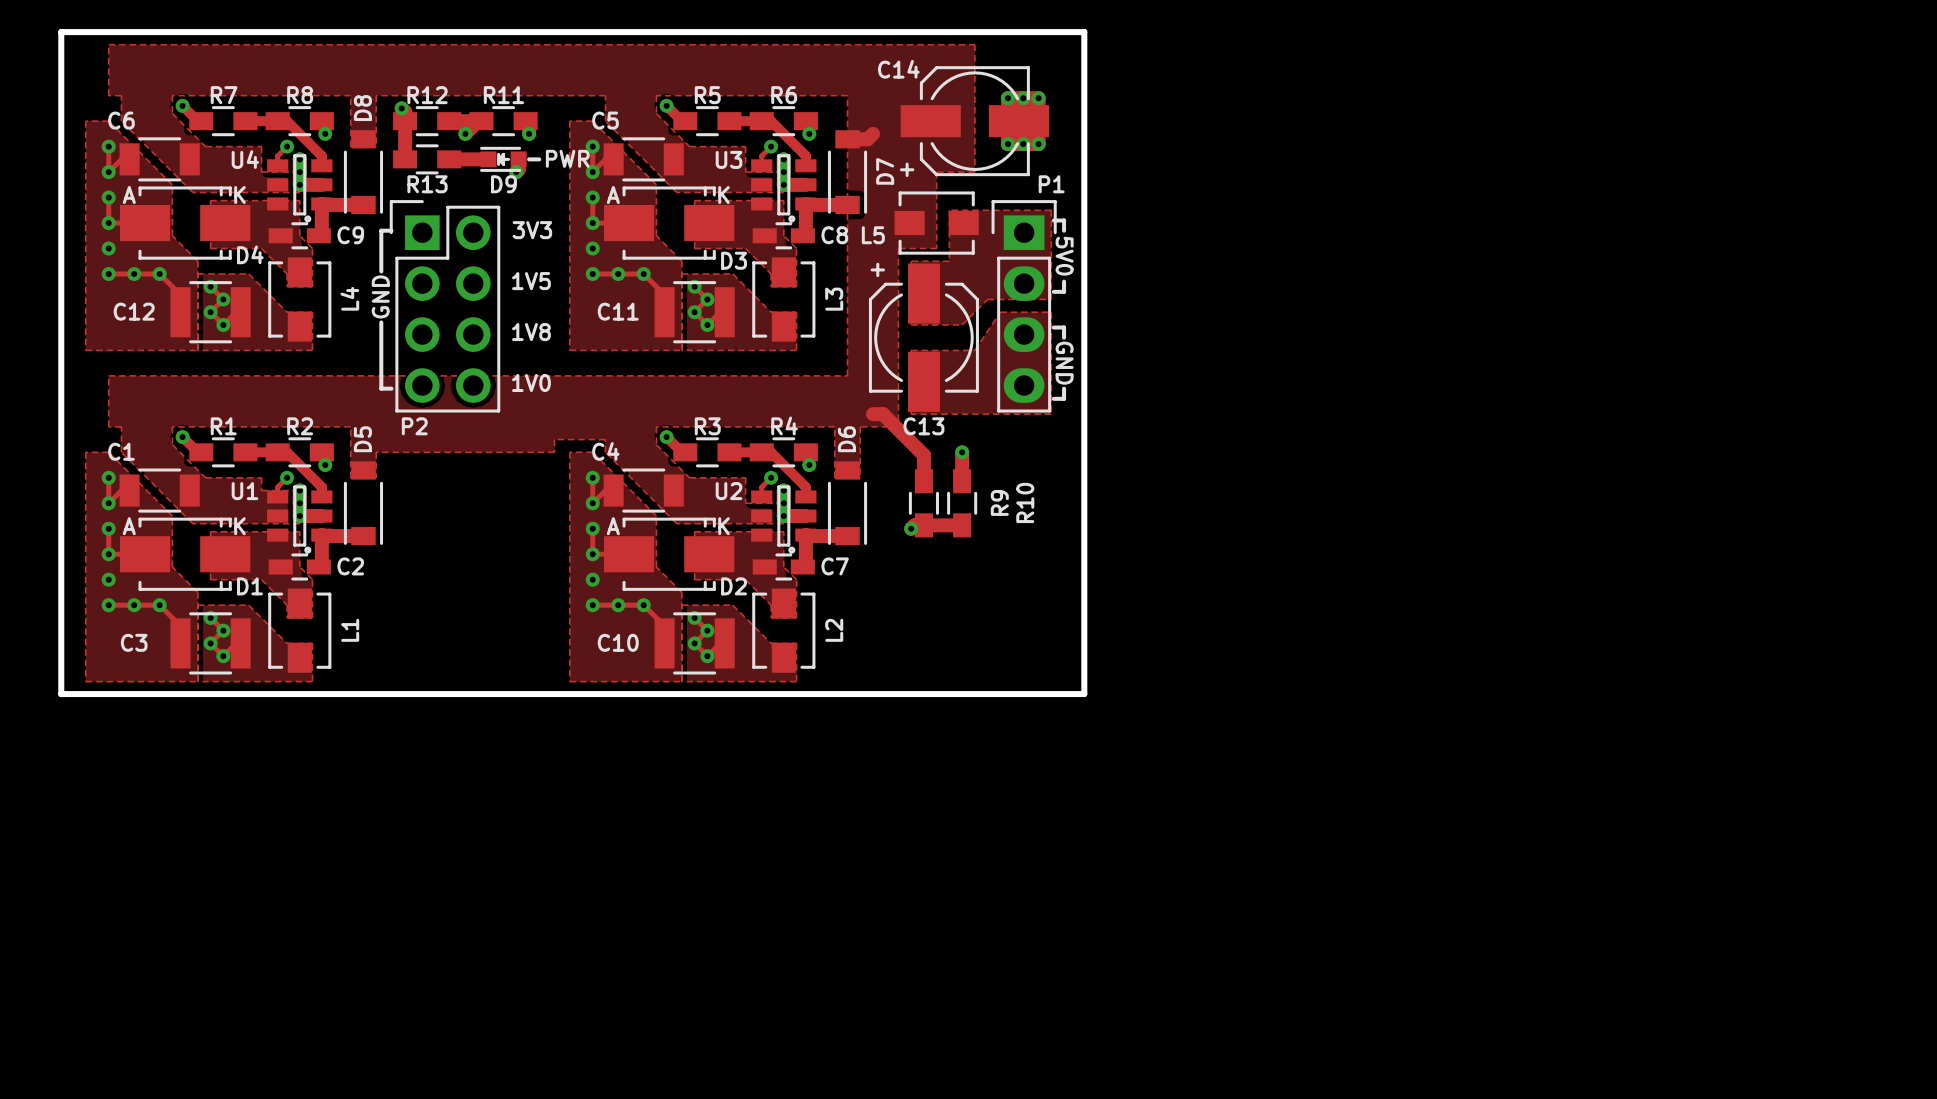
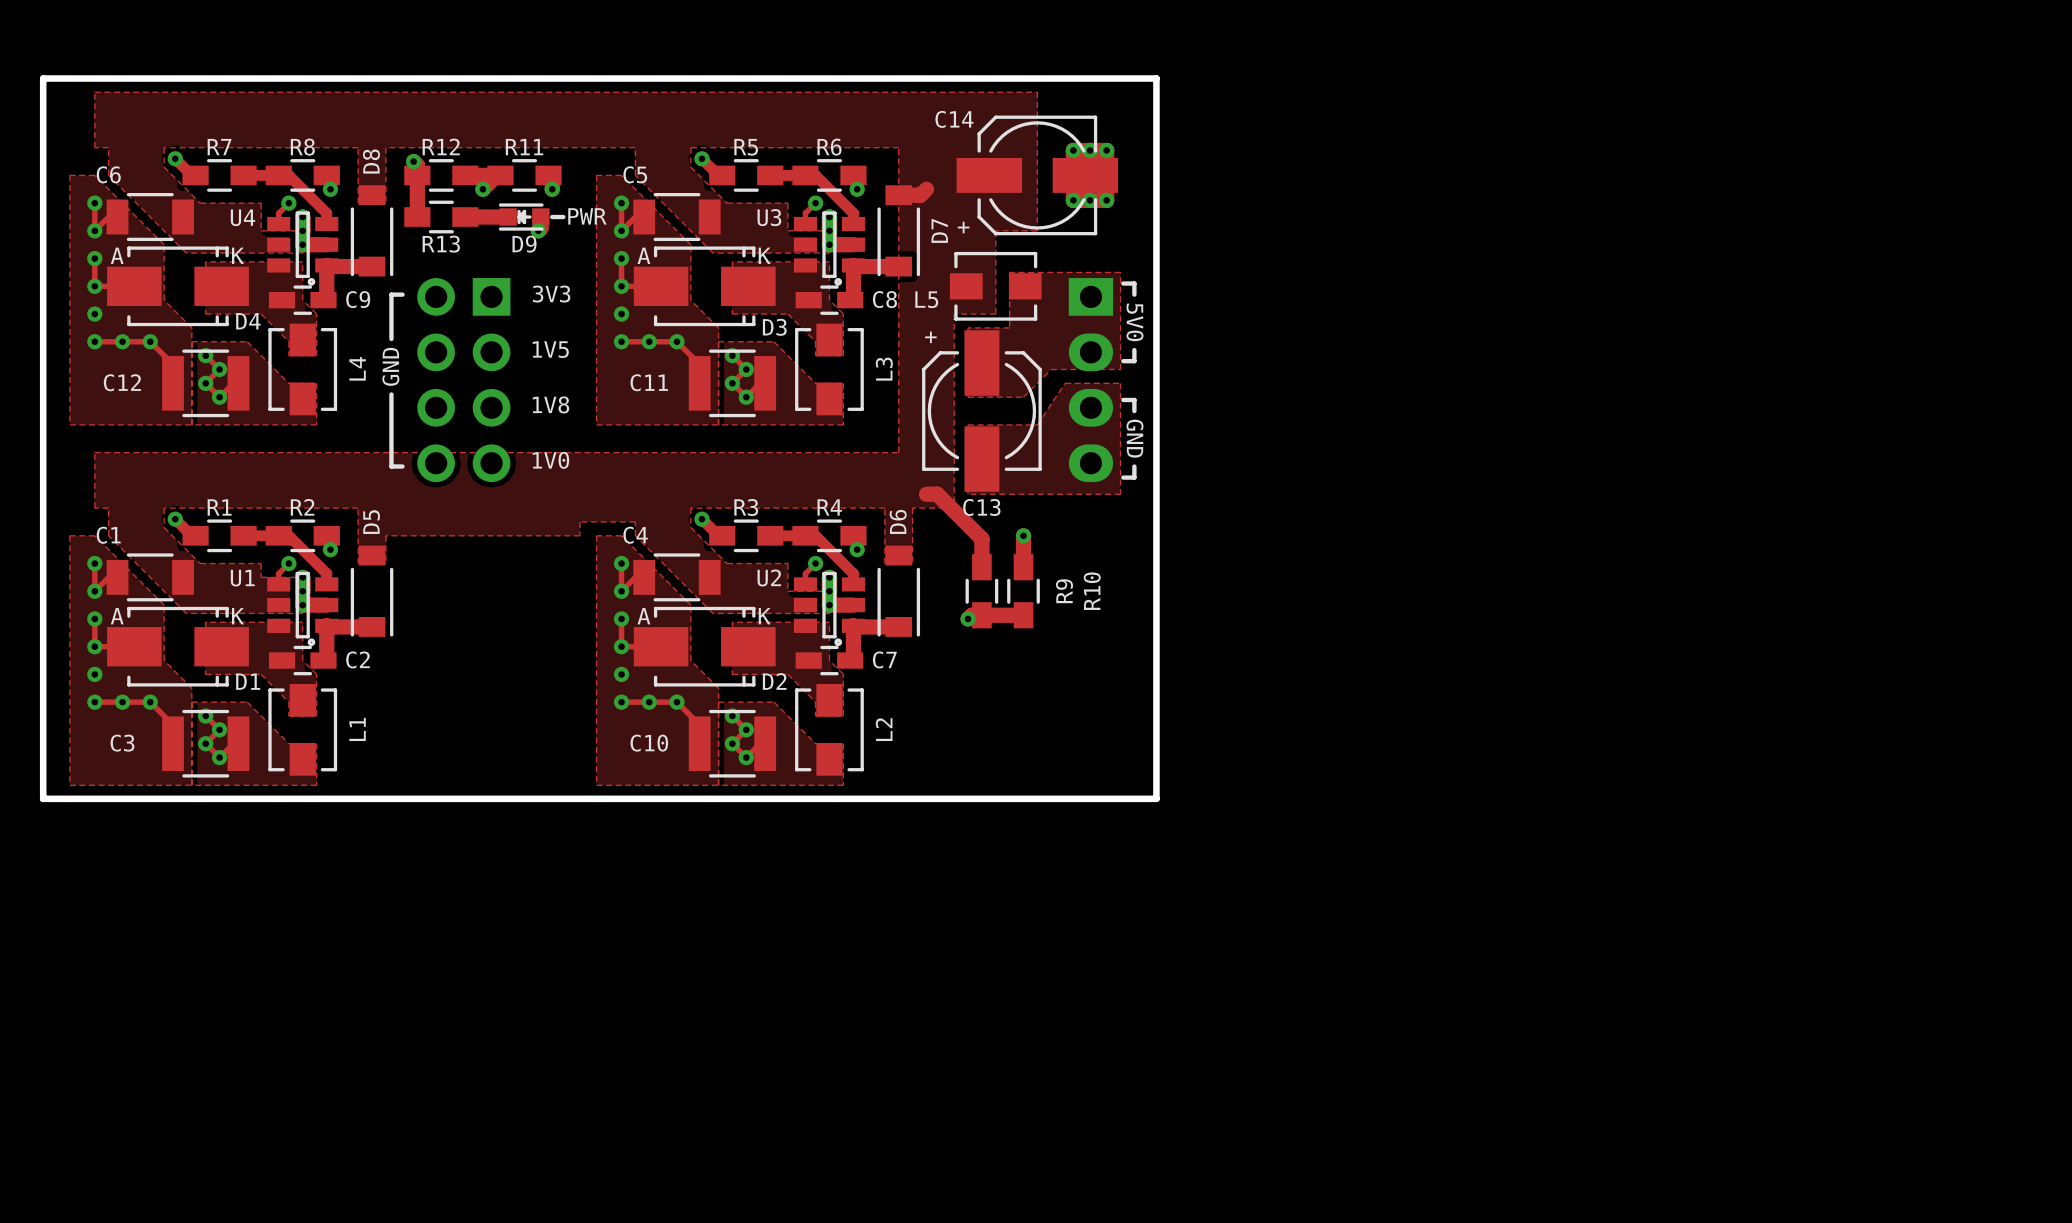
P2 side: top (445, 306) -> bottom (463, 380)
P1 side: top (1024, 306) -> bottom (1090, 380)

